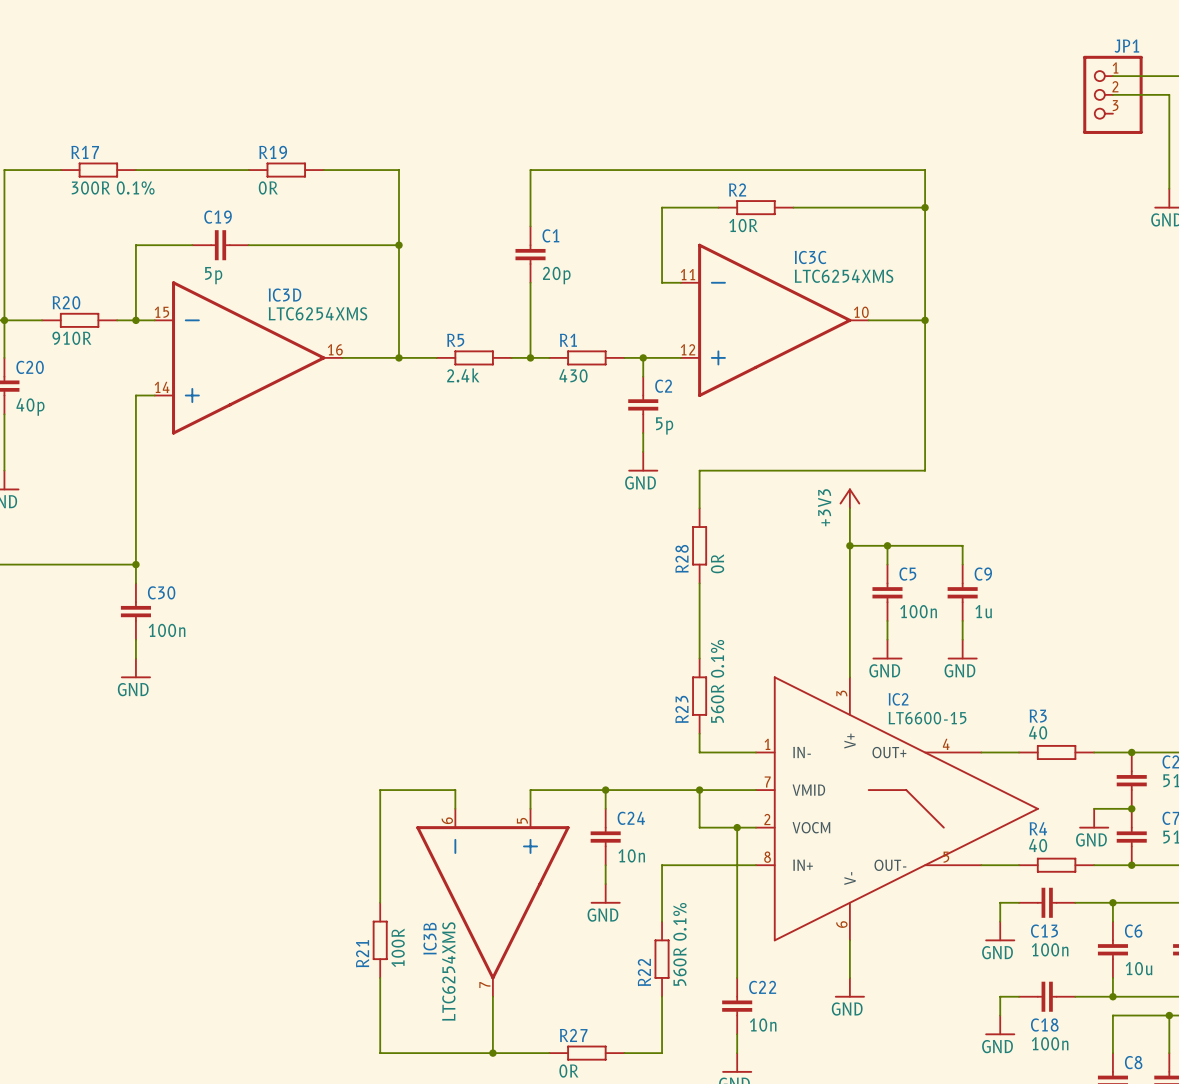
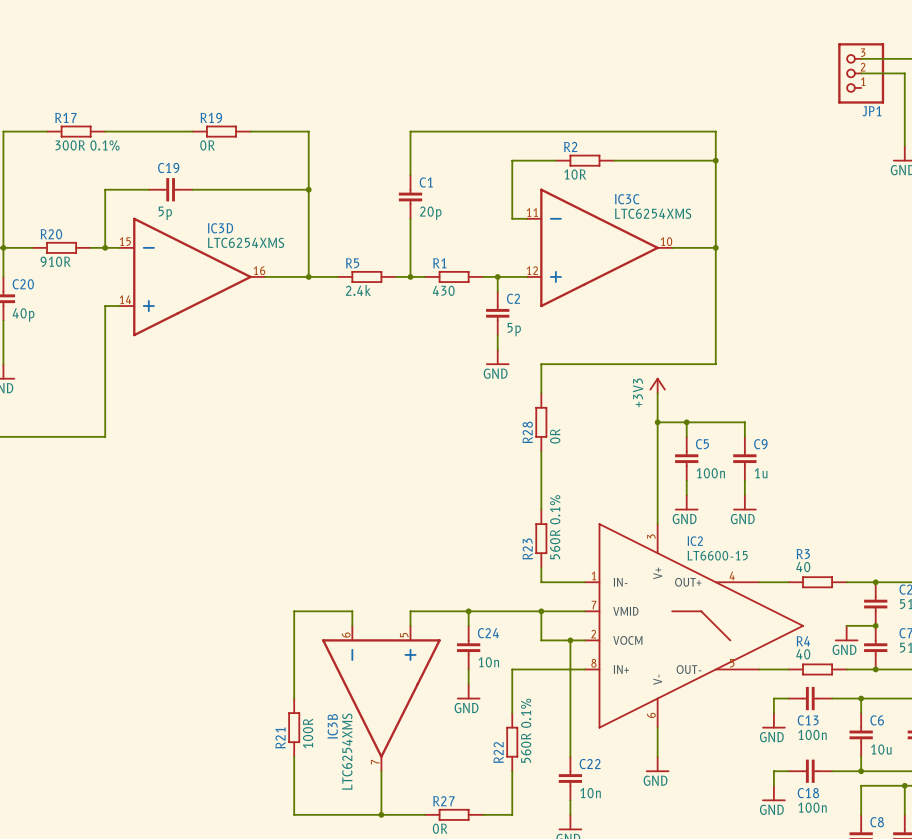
JP1 flip: as is (1112, 94) -> up-down (861, 73)
wire: (135, 564) (135, 583) -> none
junction: (135, 564) -> none
C30: 100n (135, 611) -> none
wire: (135, 639) (135, 658) -> none
power symbol: GND (135, 668) -> none

